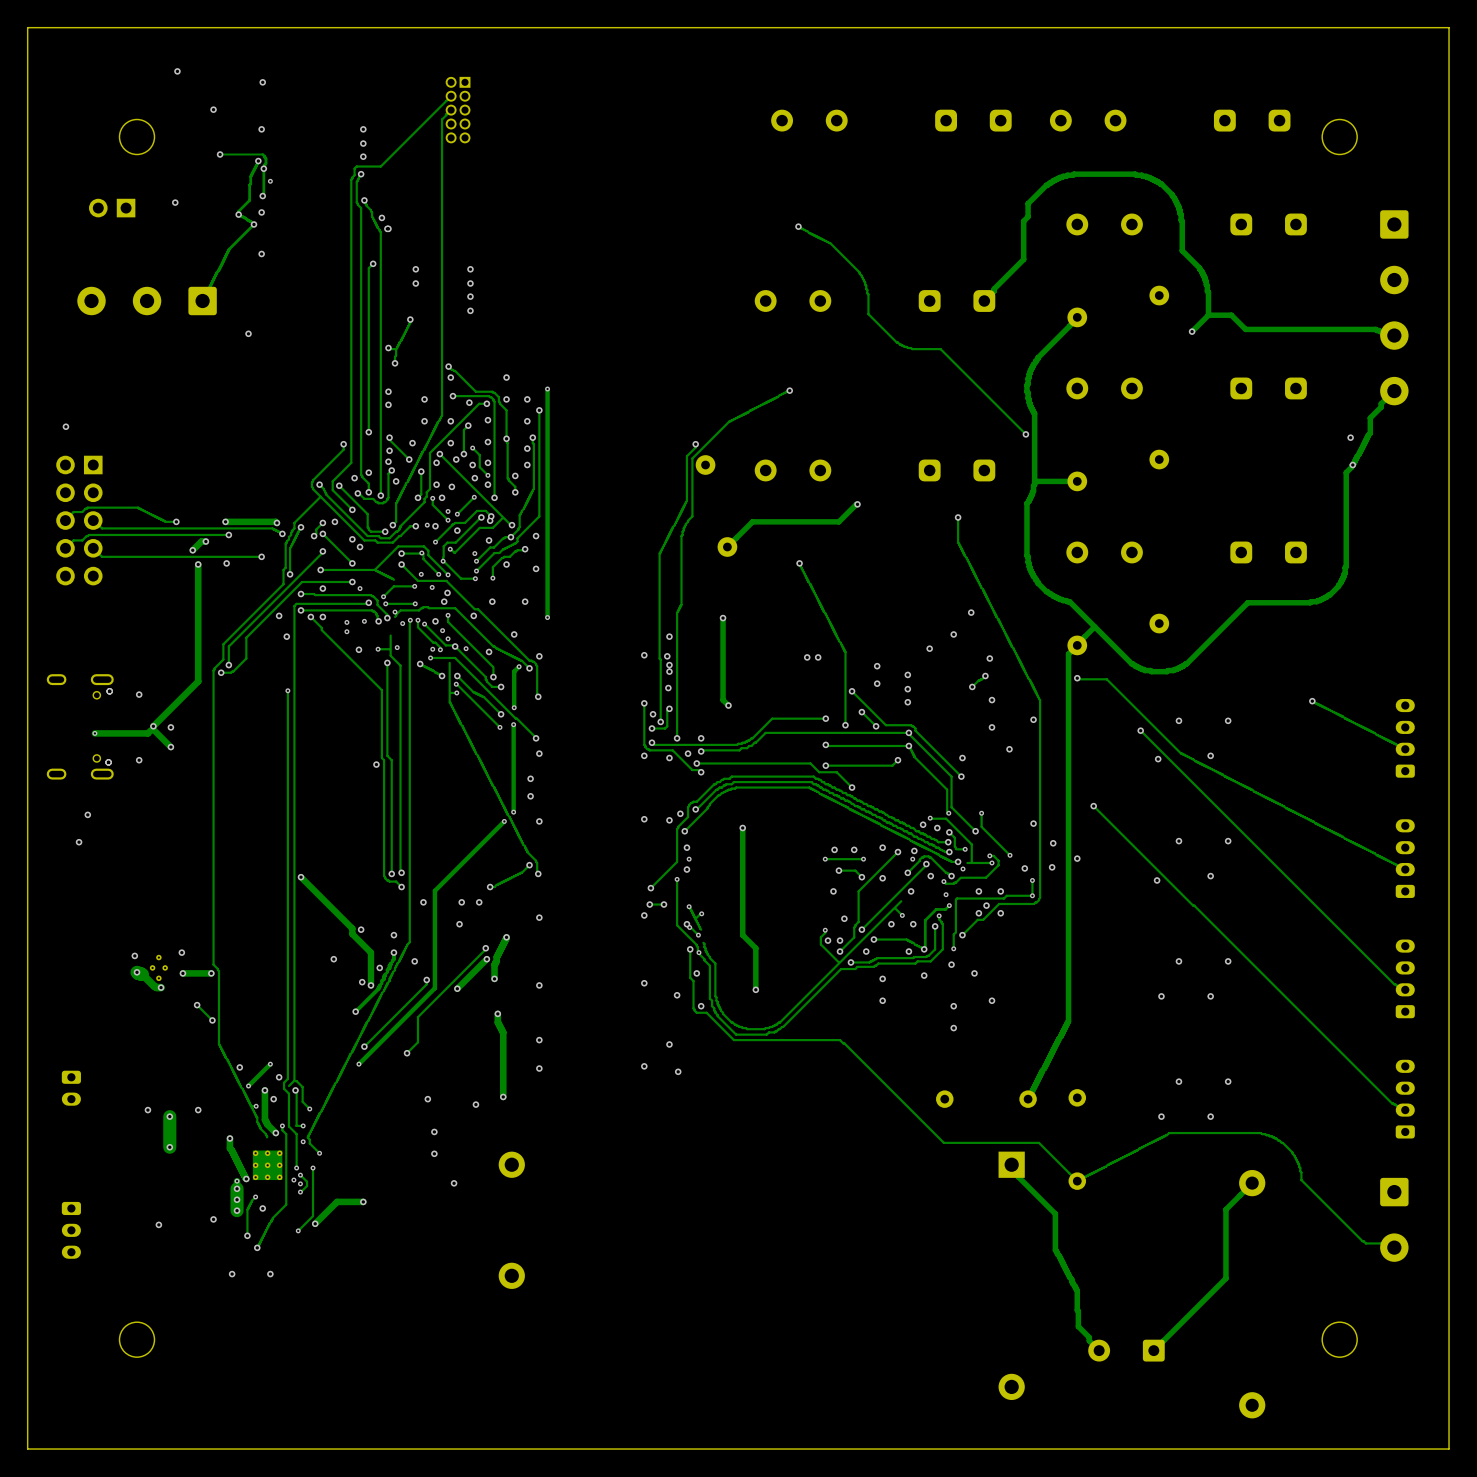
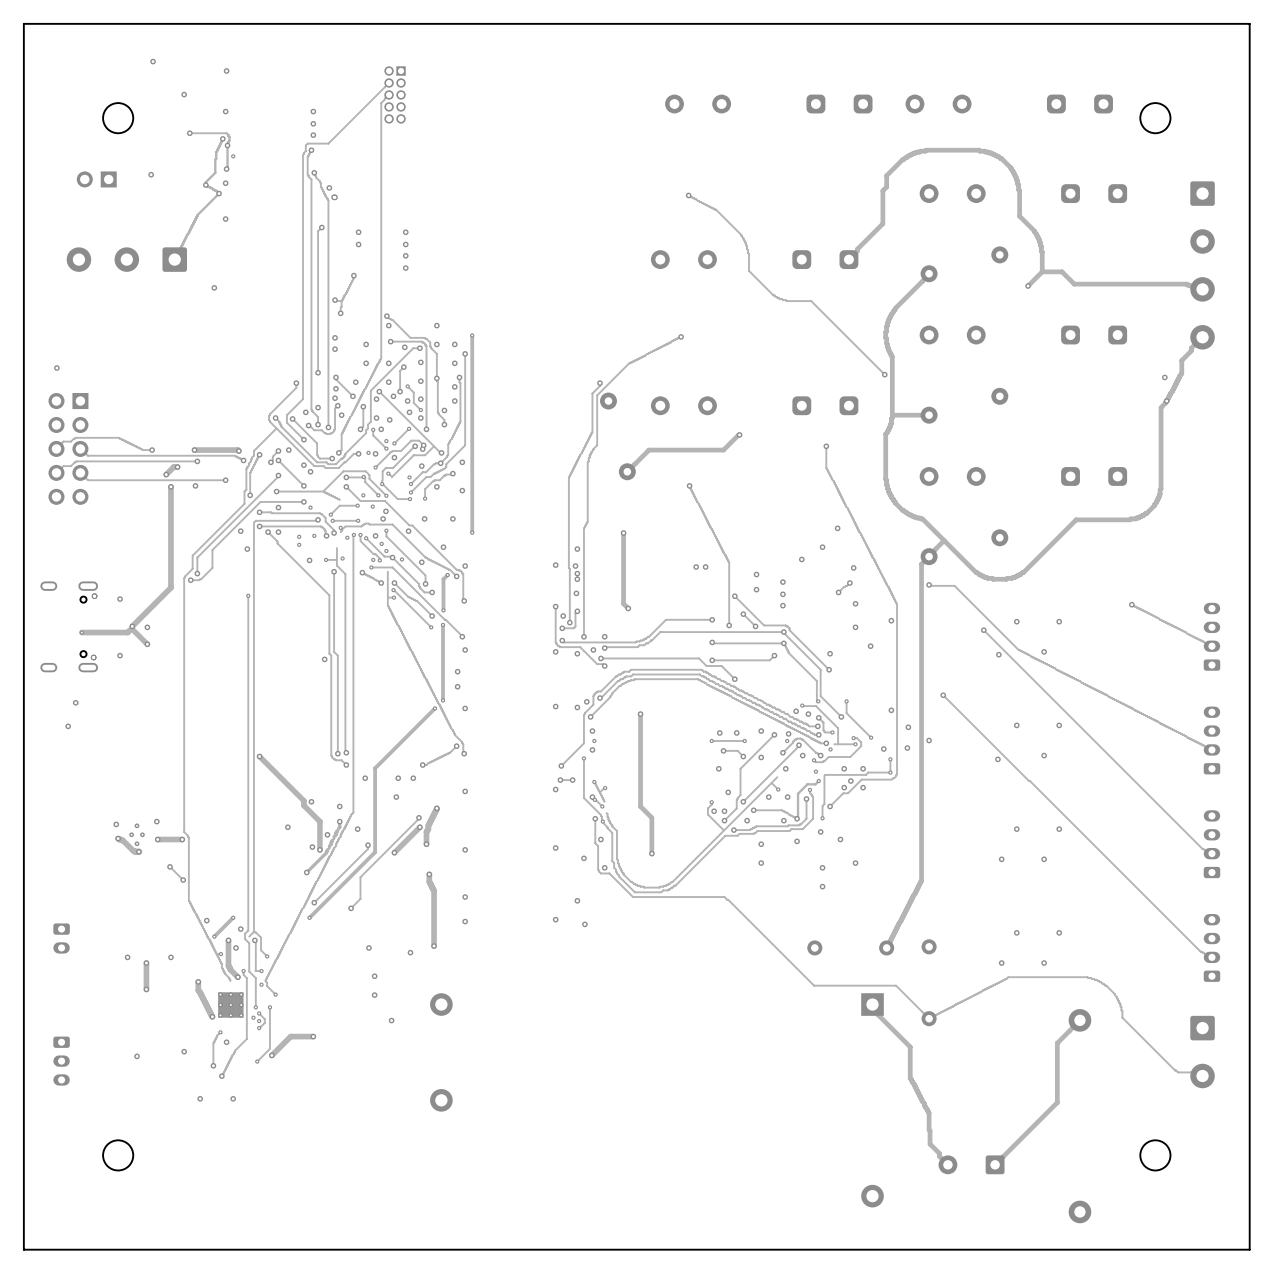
track width: thick (137, 972) (142, 974) (154, 986) -> thin (118, 838) (122, 840) (133, 850)
track width: thick (169, 1116) (169, 1147) -> thin (146, 963) (146, 989)
track: (237, 1181) (237, 1210) -> none
via: (237, 1181) -> none
via: (237, 1188) -> none
via: (237, 1199) -> none
via: (237, 1210) -> none

